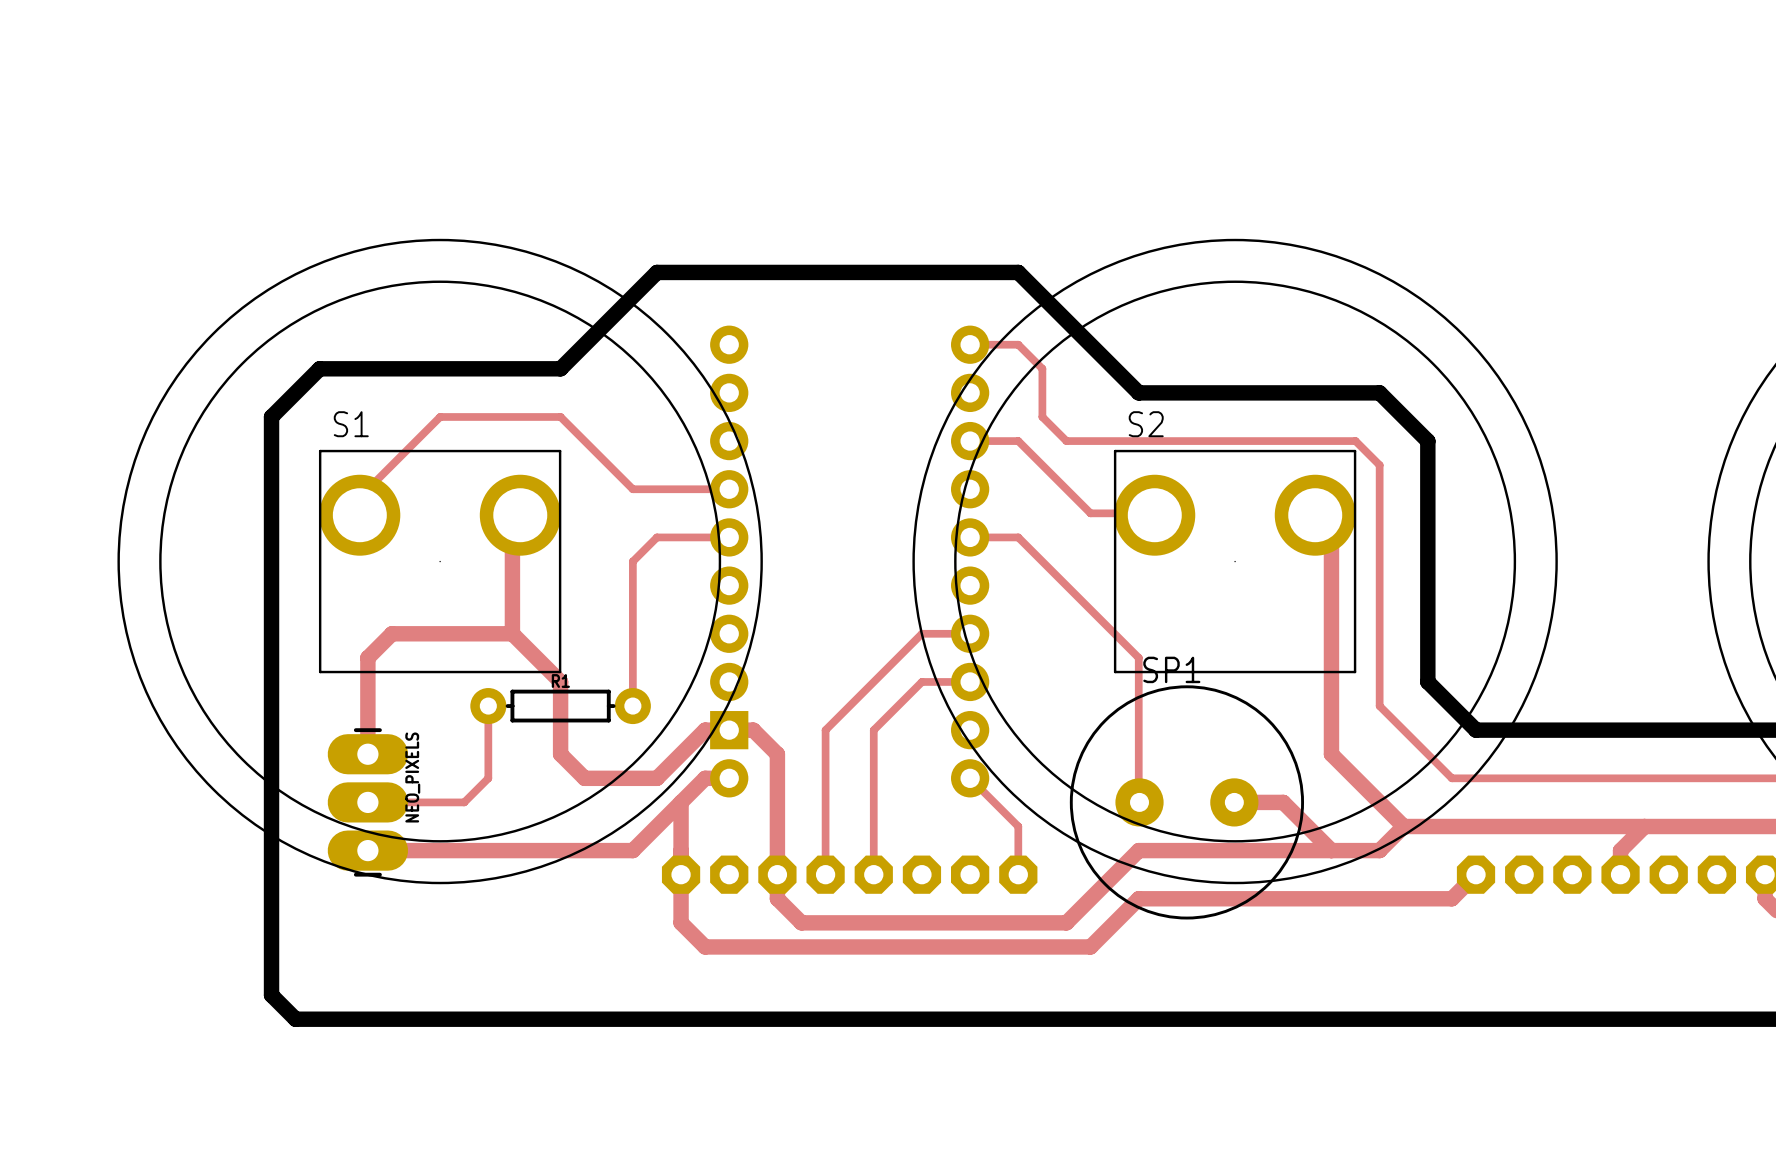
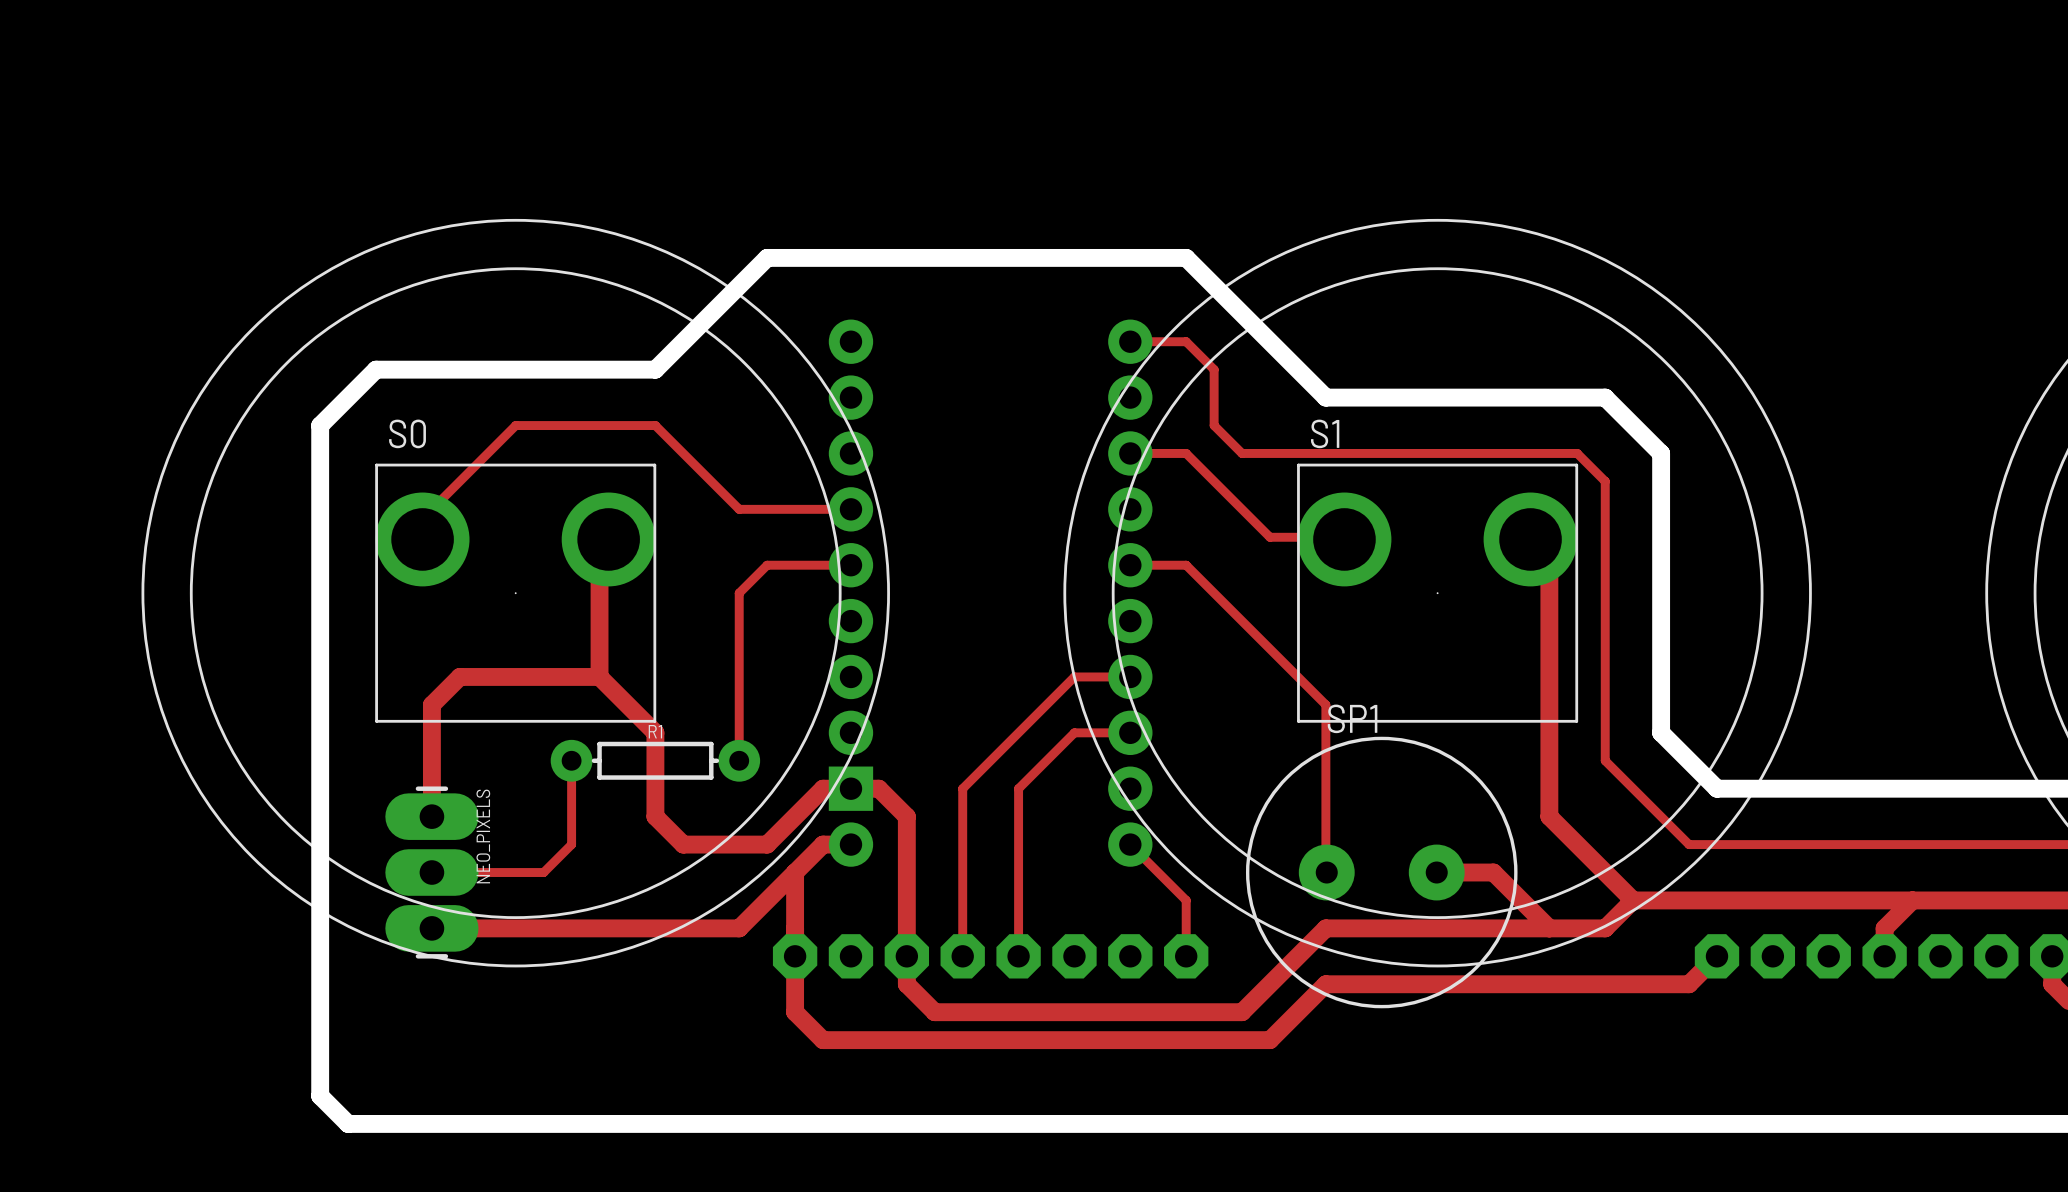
S1 name: S1 (351, 424) -> S0 (407, 433)
S2 name: S2 (1146, 424) -> S1 (1325, 433)

